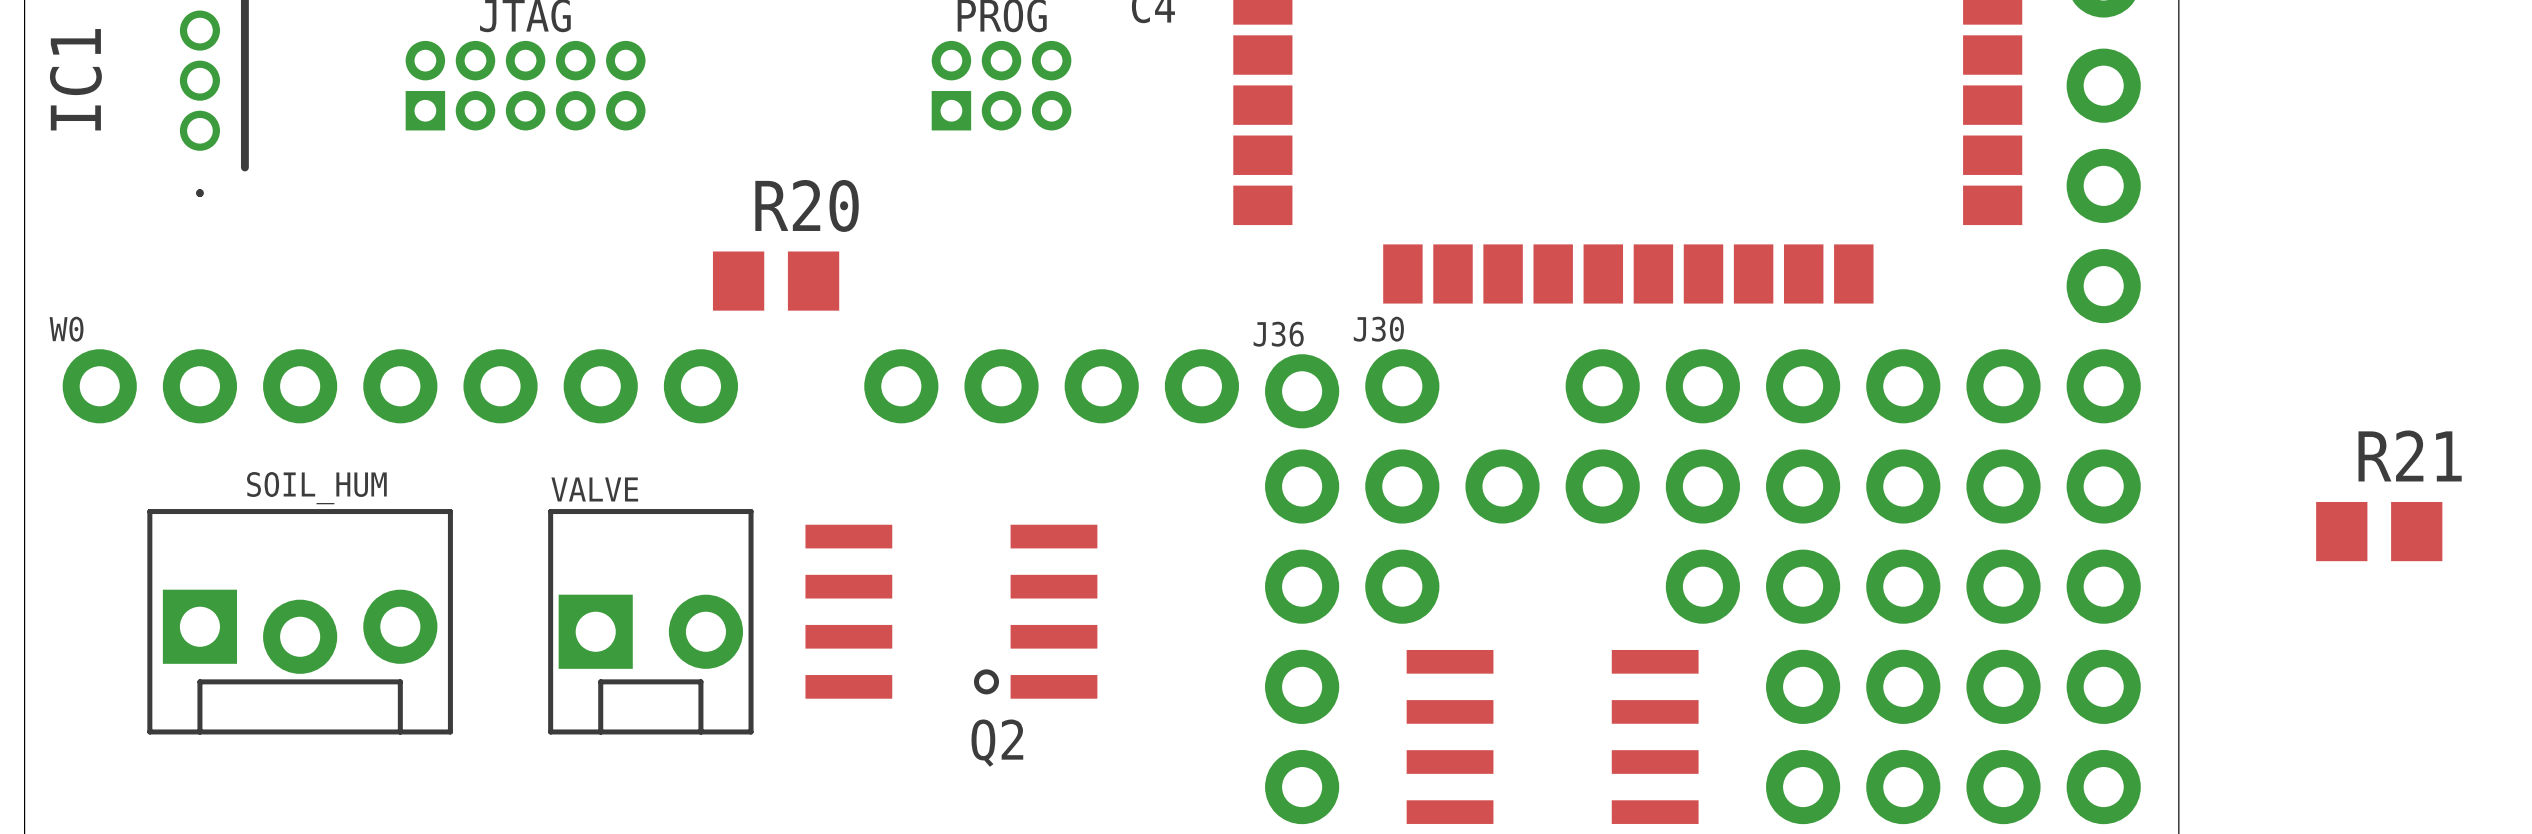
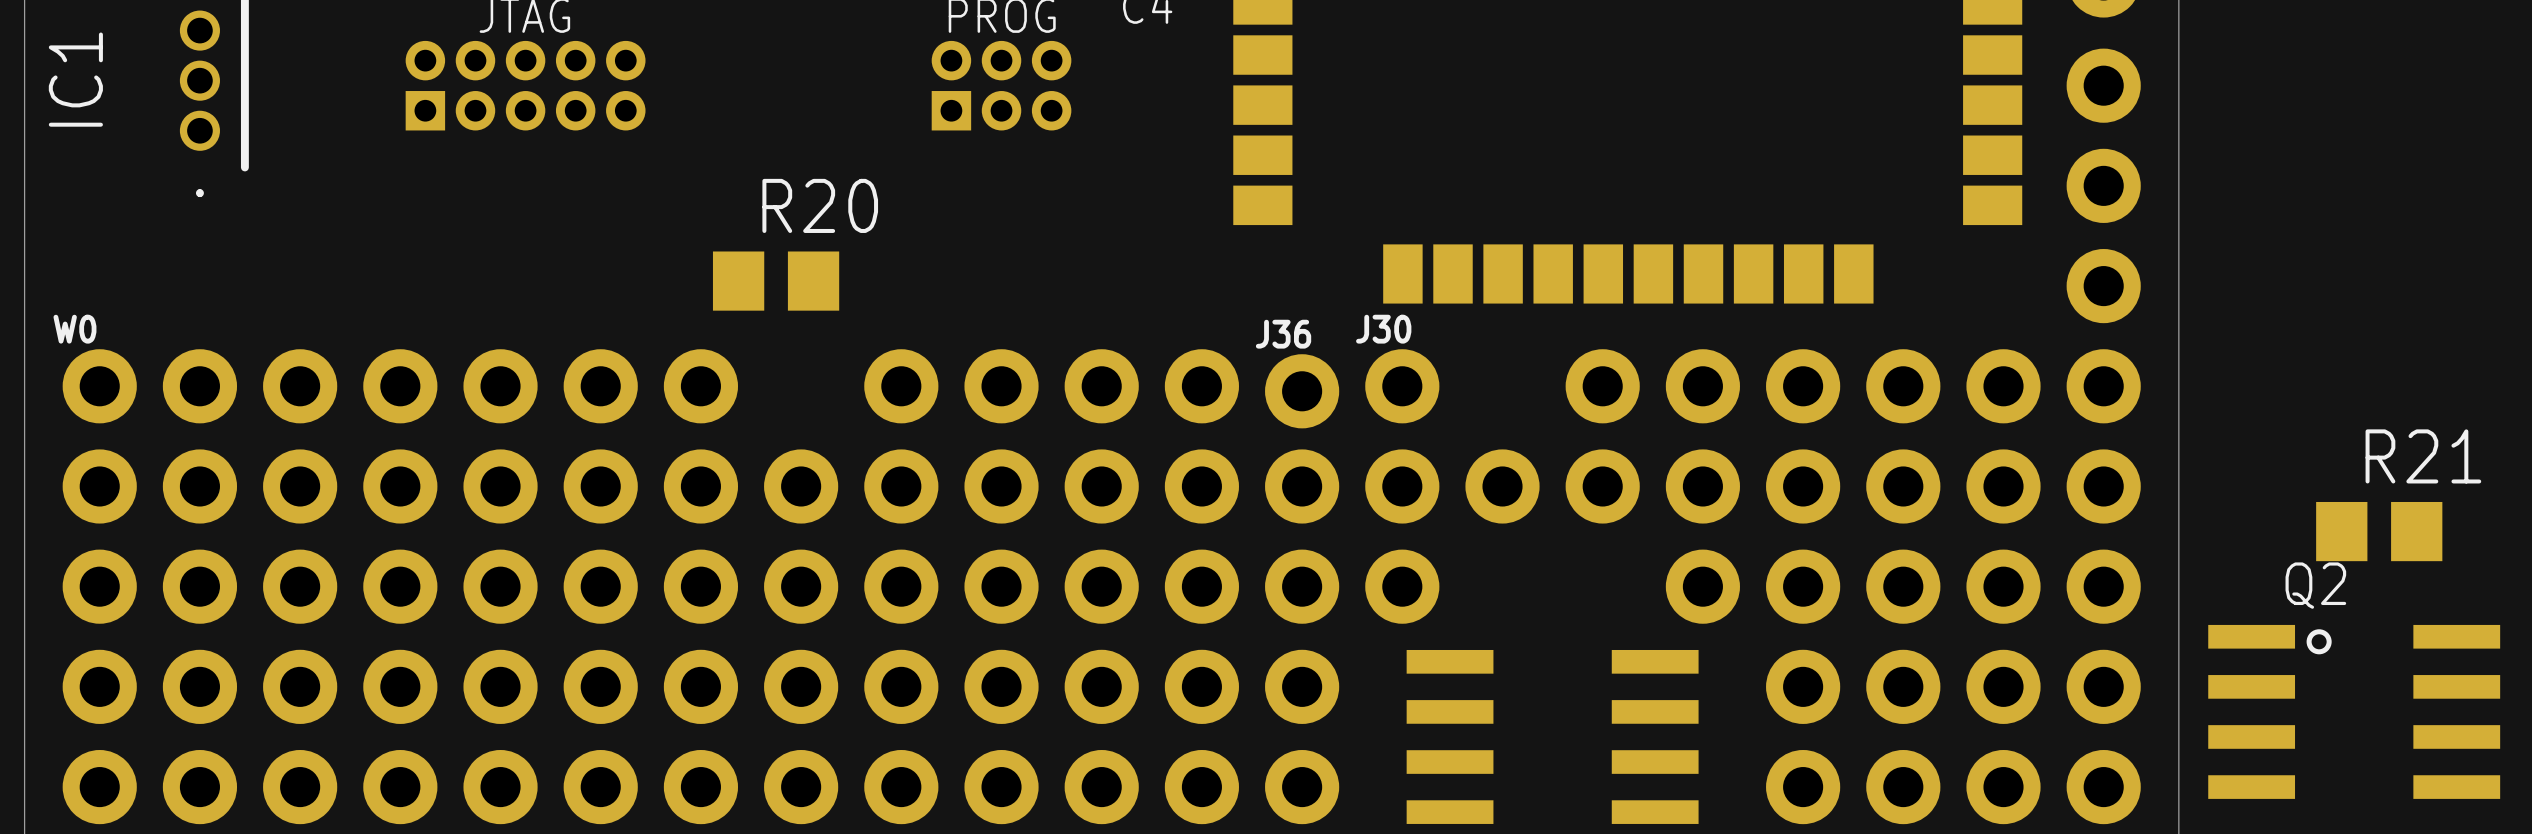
part: none -> (650, 486)
part: none -> (650, 586)
Q2 rotation: 0° (951, 611) -> 180° (2354, 711)
Q2 position: (951, 611) -> (2354, 711)
SOIL_HUM: (300, 621) -> none
VALVE: (650, 621) -> none
part: none -> (650, 686)
part: none -> (650, 787)

